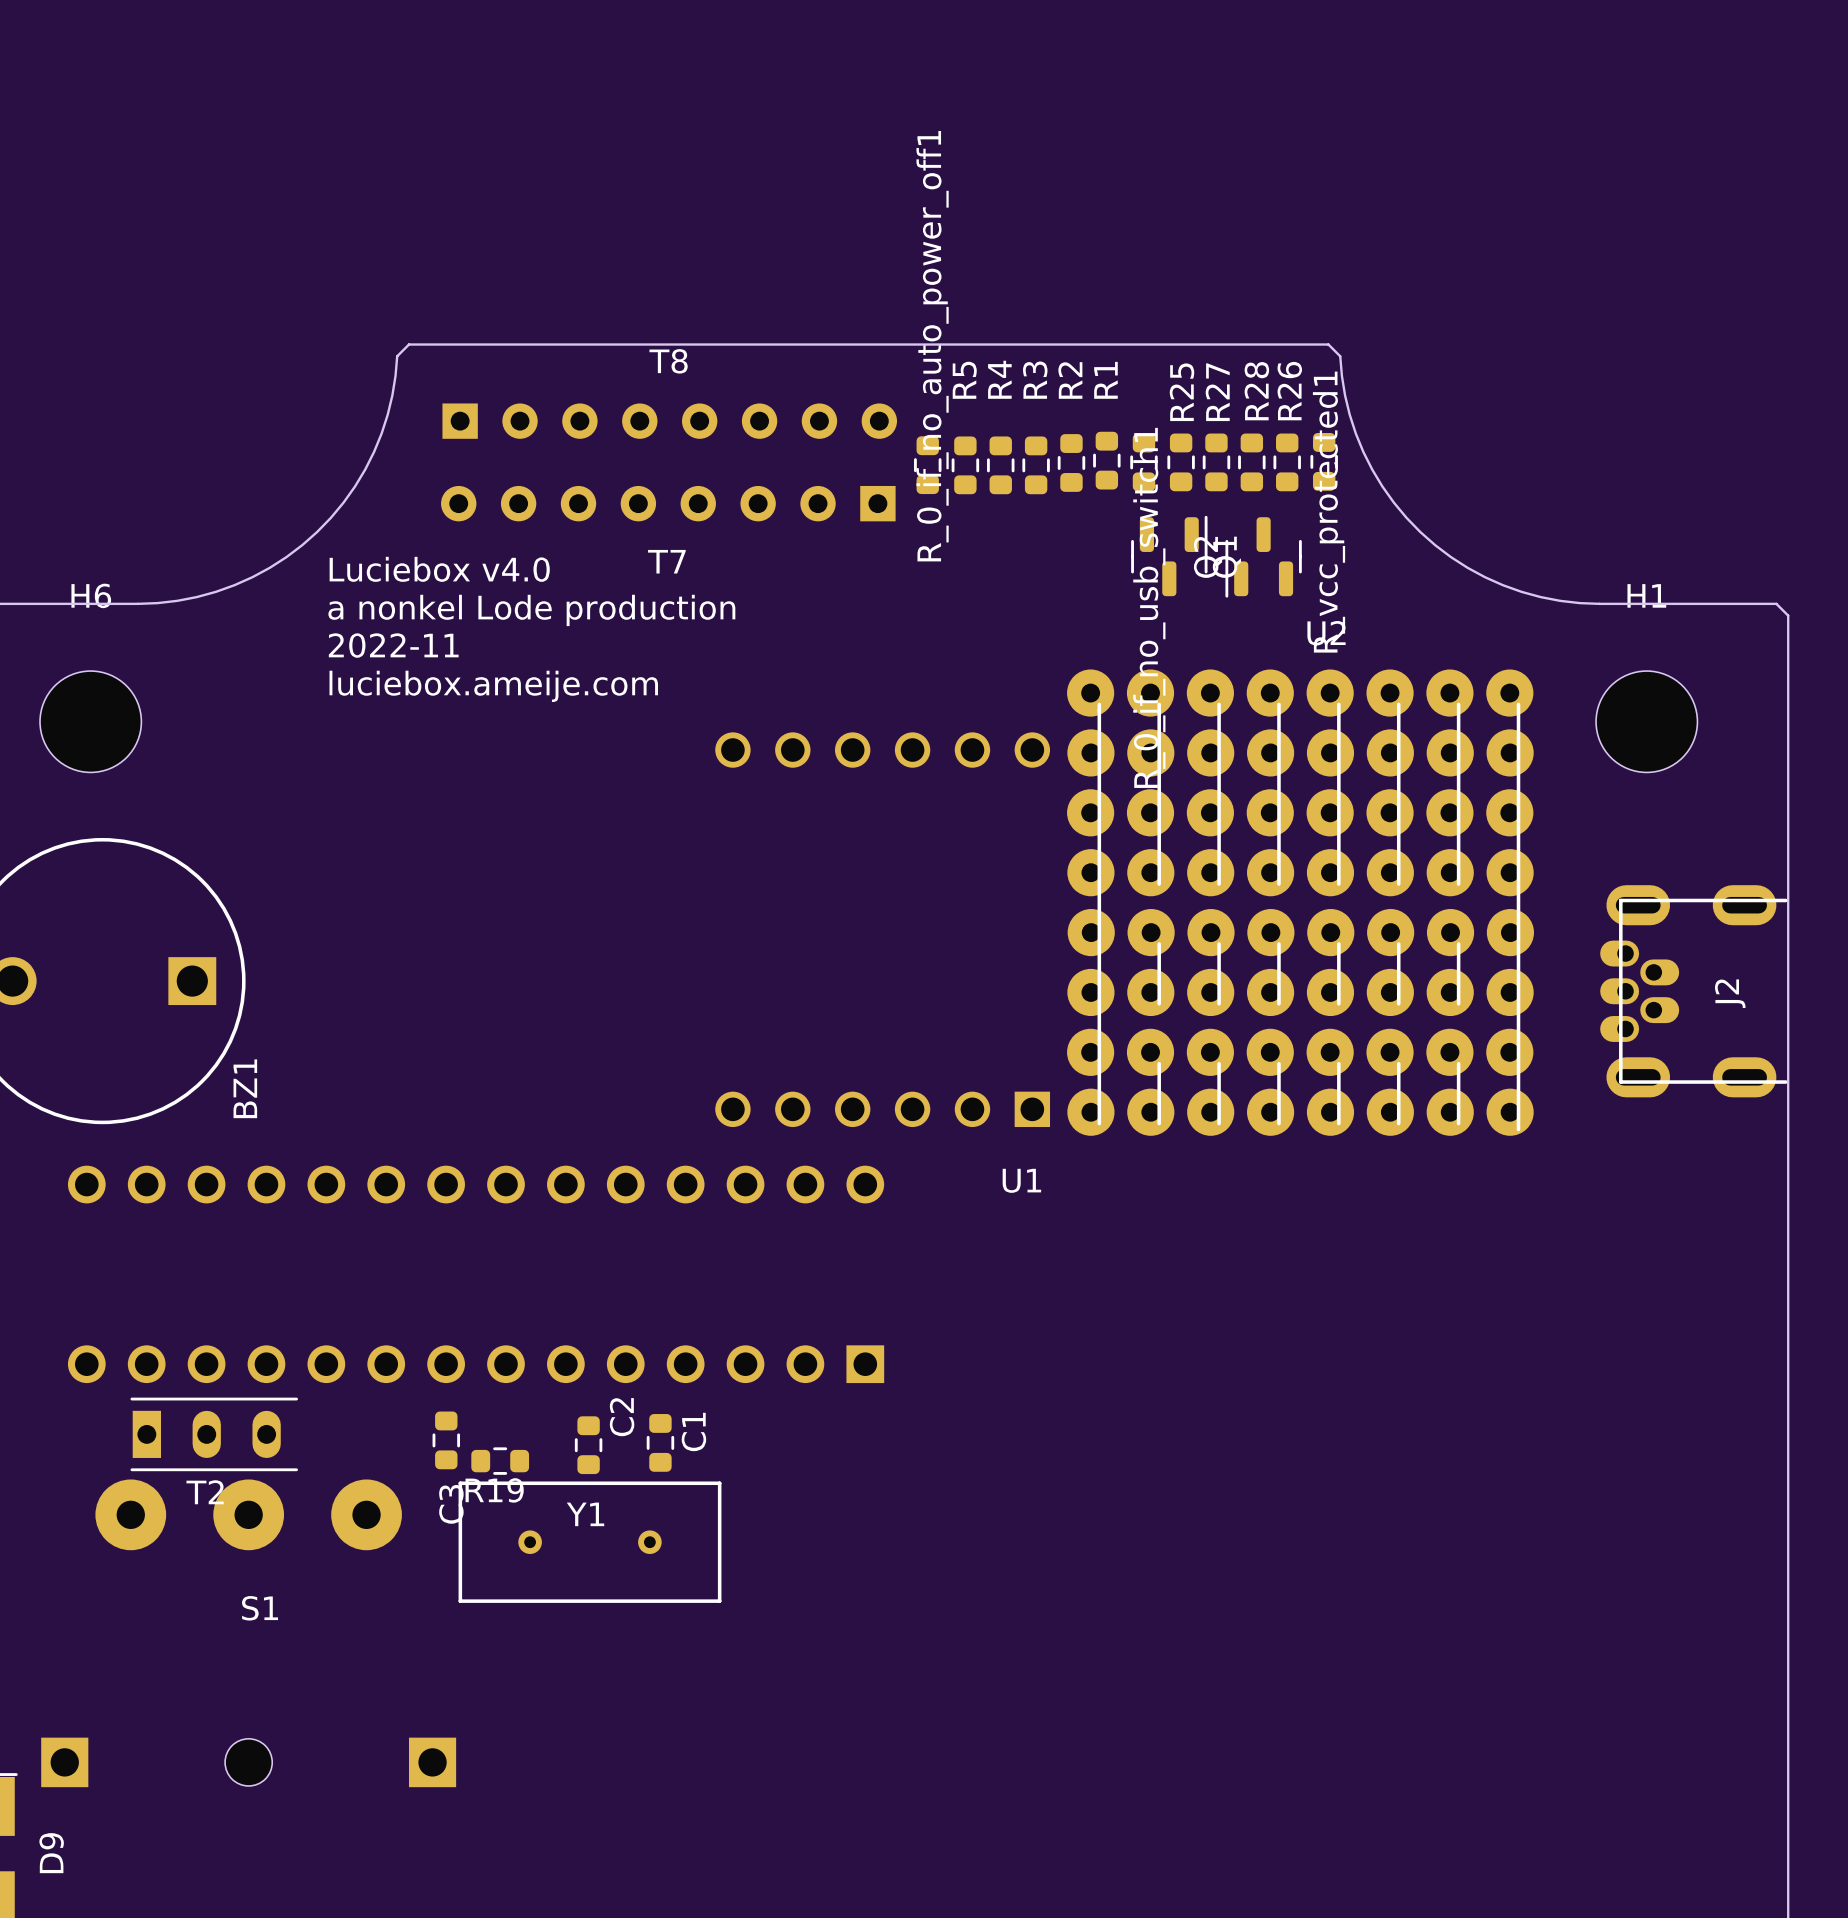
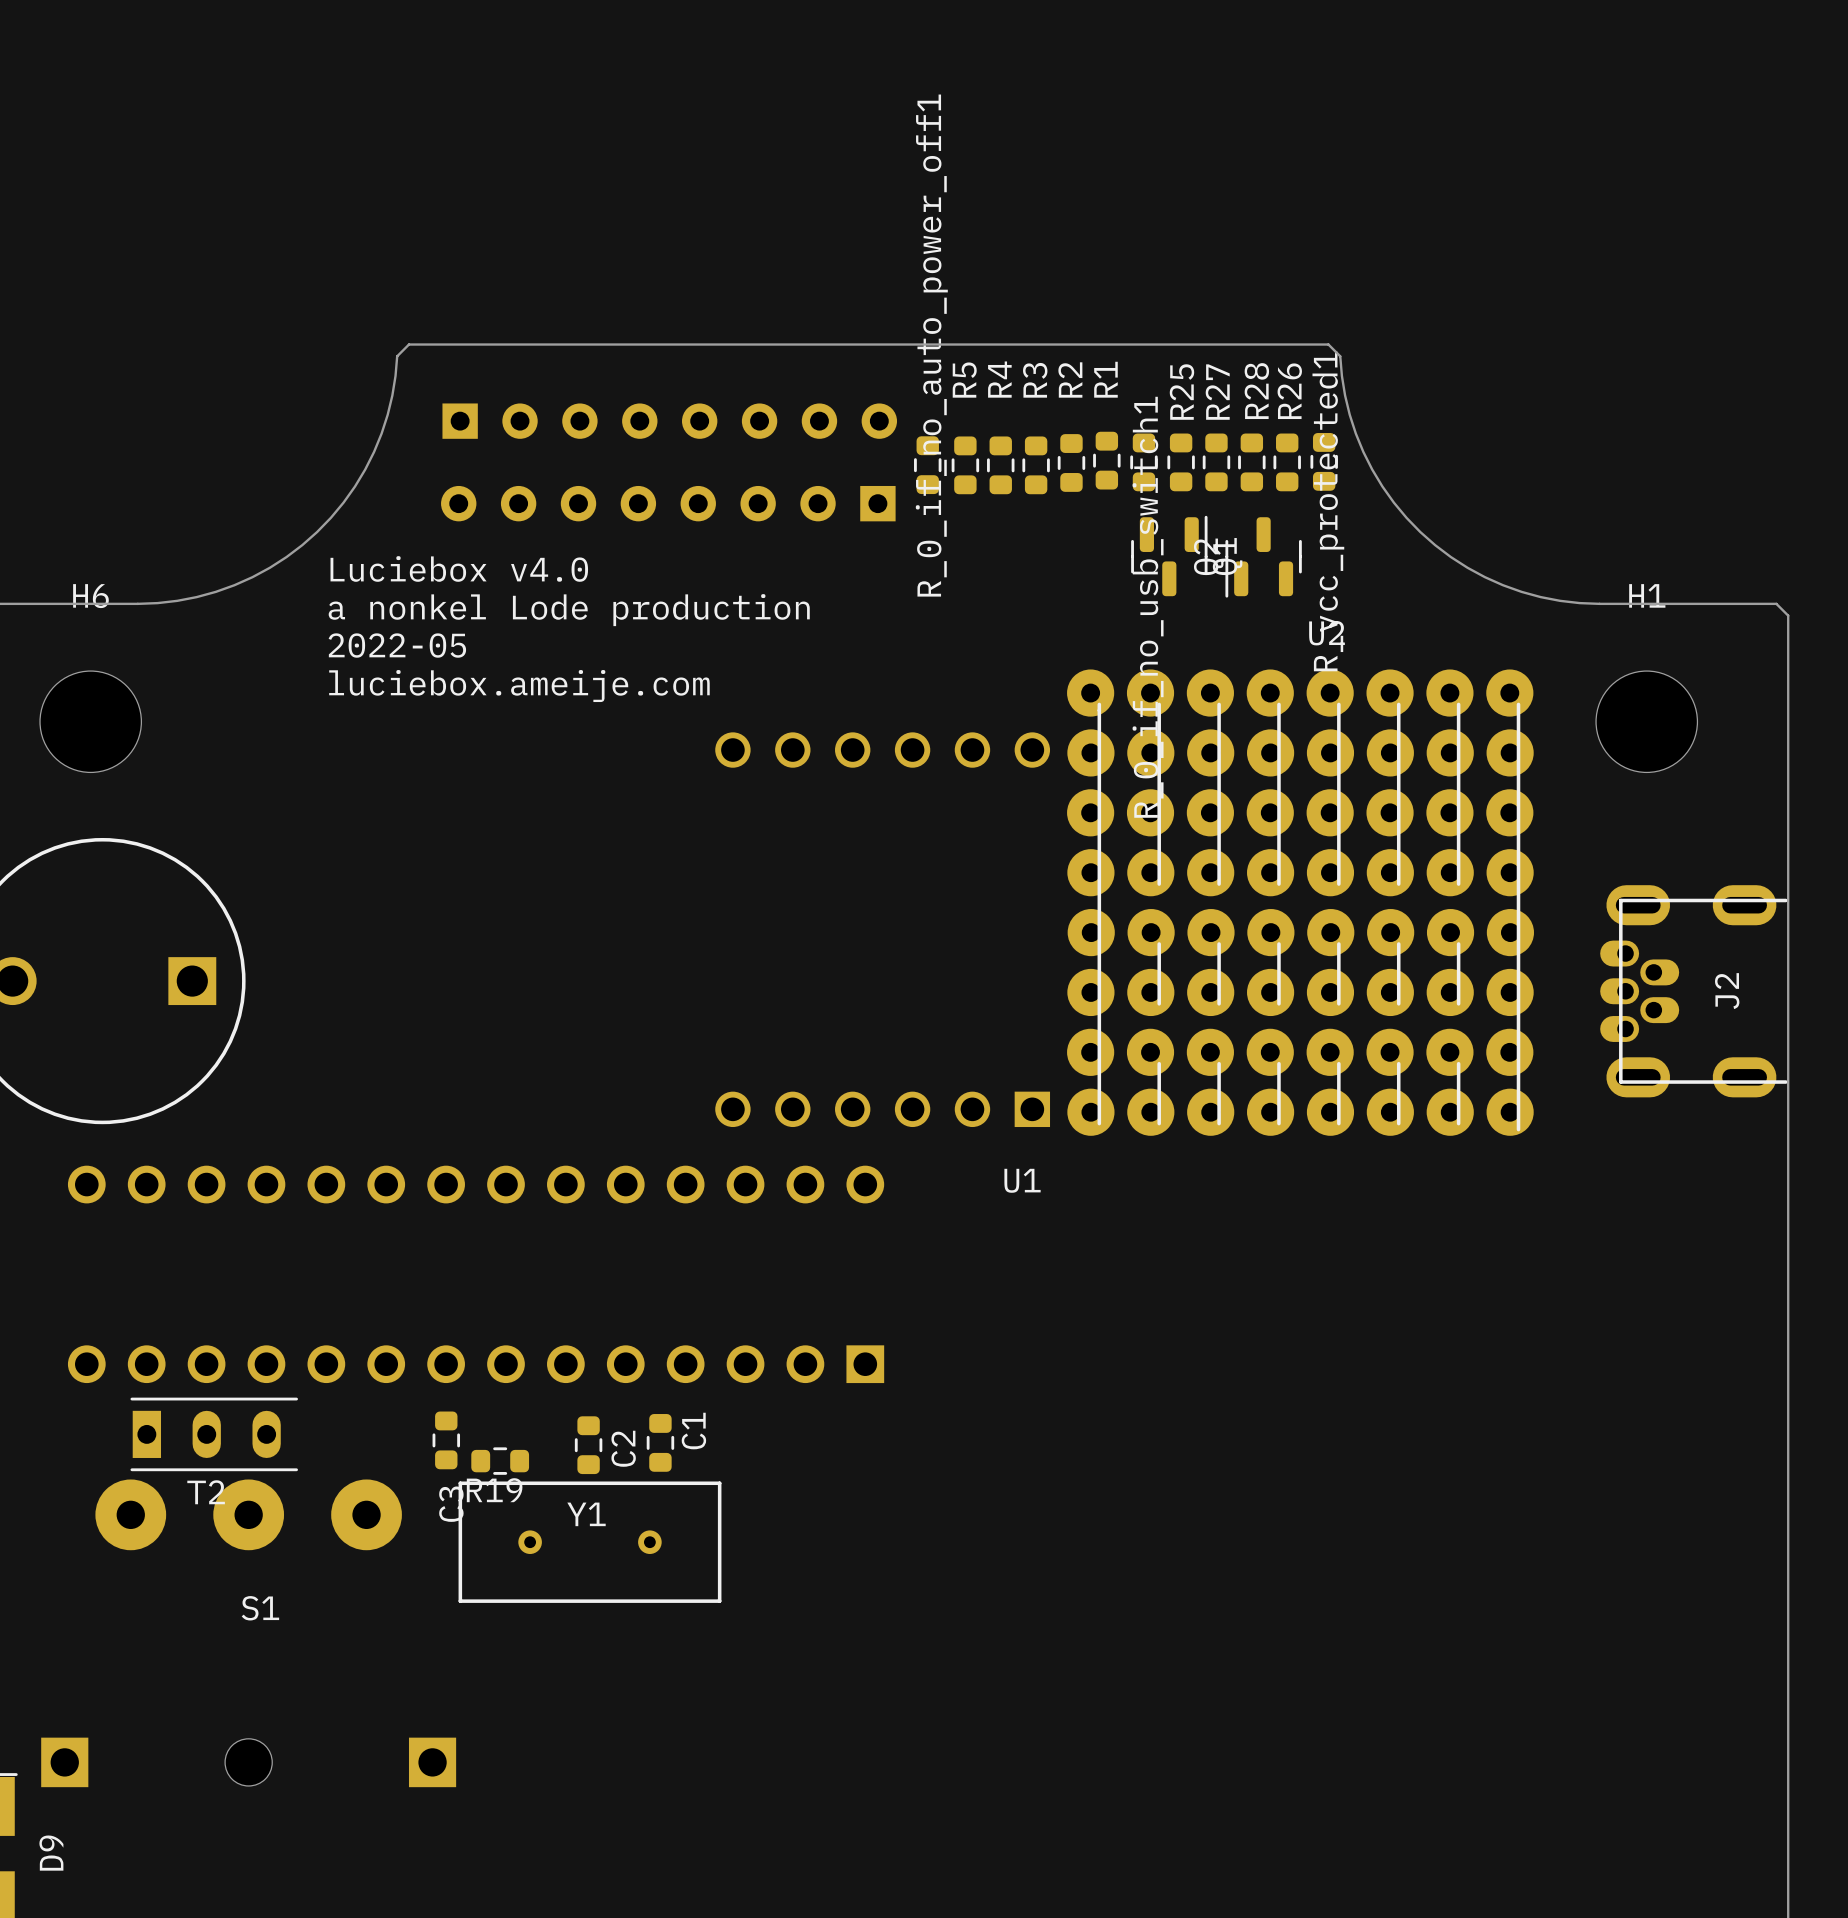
T8 name: T8 (668, 361) -> none
T7 name: T7 (666, 561) -> none
text: 2022-11 (393, 645) -> 2022-05 (397, 645)
BZ1 name: BZ1 (245, 1088) -> none
C2 name position: C2 (622, 1417) -> C2 (623, 1448)

